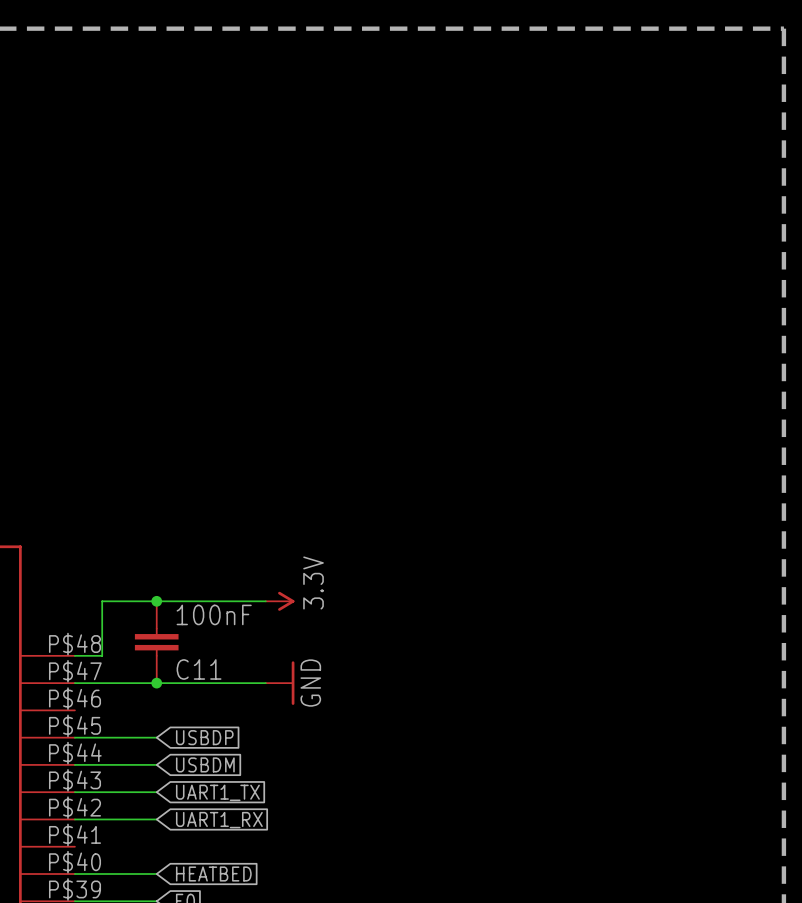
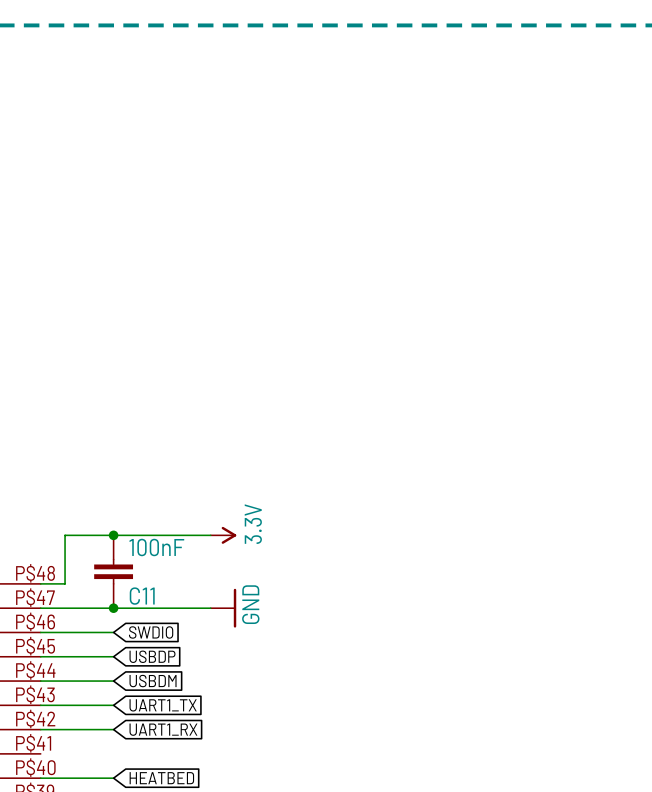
wire: none -> (40, 632) (113, 632)
global label: none -> SWDIO (151, 632)

